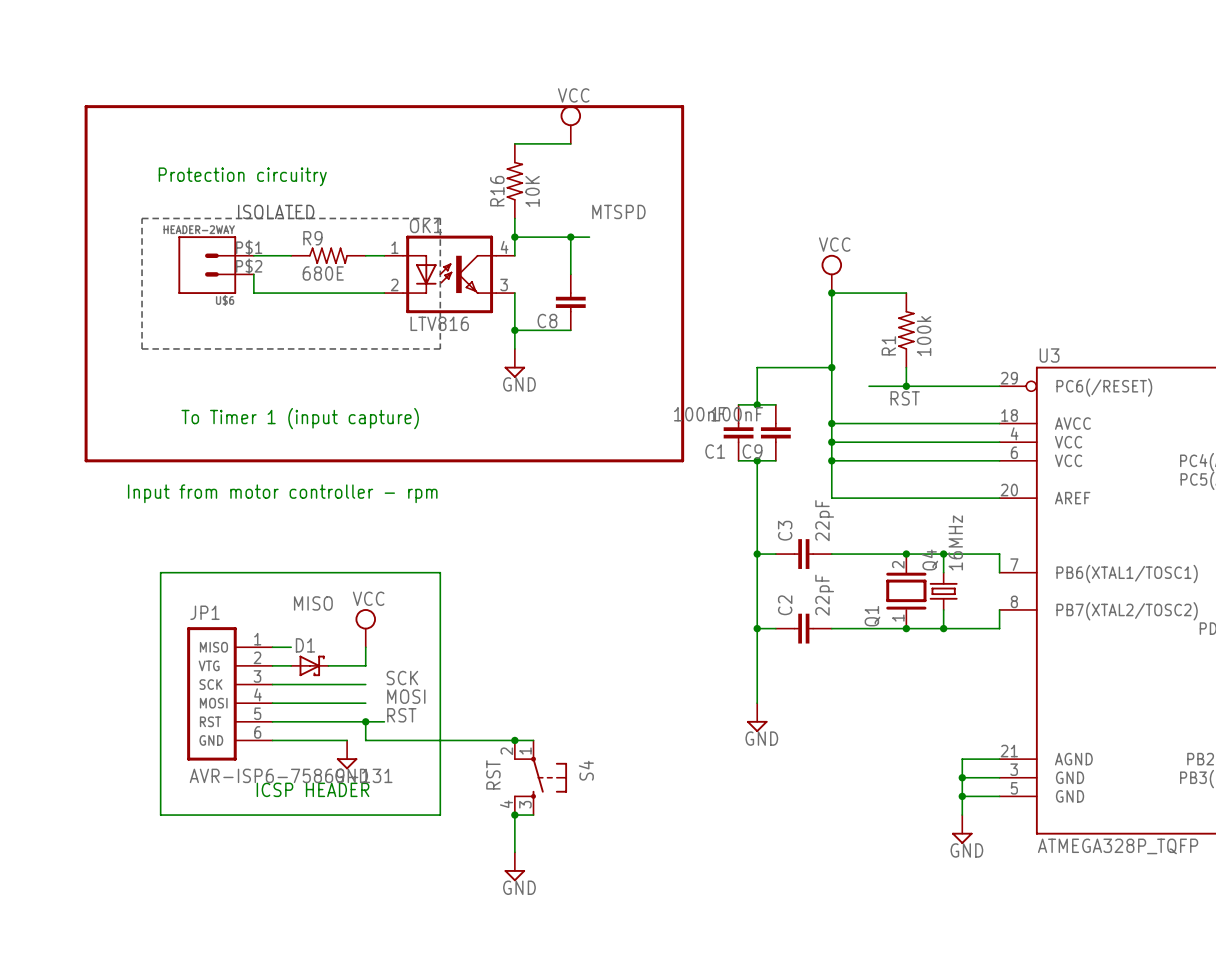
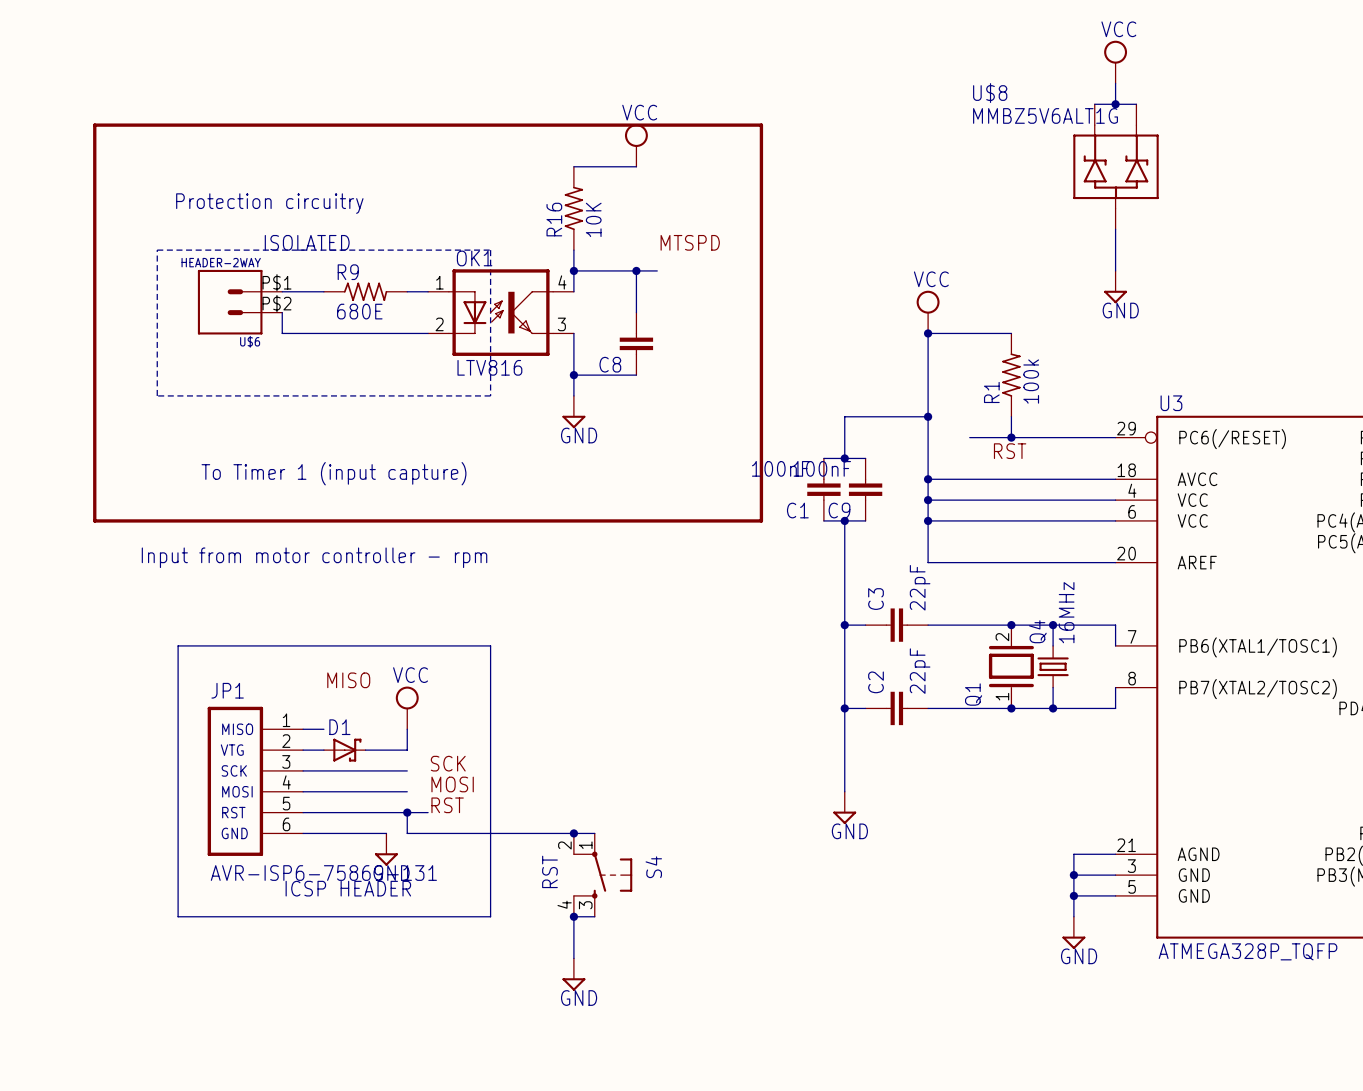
power symbol: none -> VCC (1115, 62)
wire: none -> (1115, 83) (1115, 104)
wire: none -> (1094, 104) (1136, 104)
junction: none -> (1115, 104)
U$8: none -> MMBZ5V6ALT1G (1116, 166)
wire: none -> (1115, 229) (1115, 270)
power symbol: none -> GND (1115, 287)

